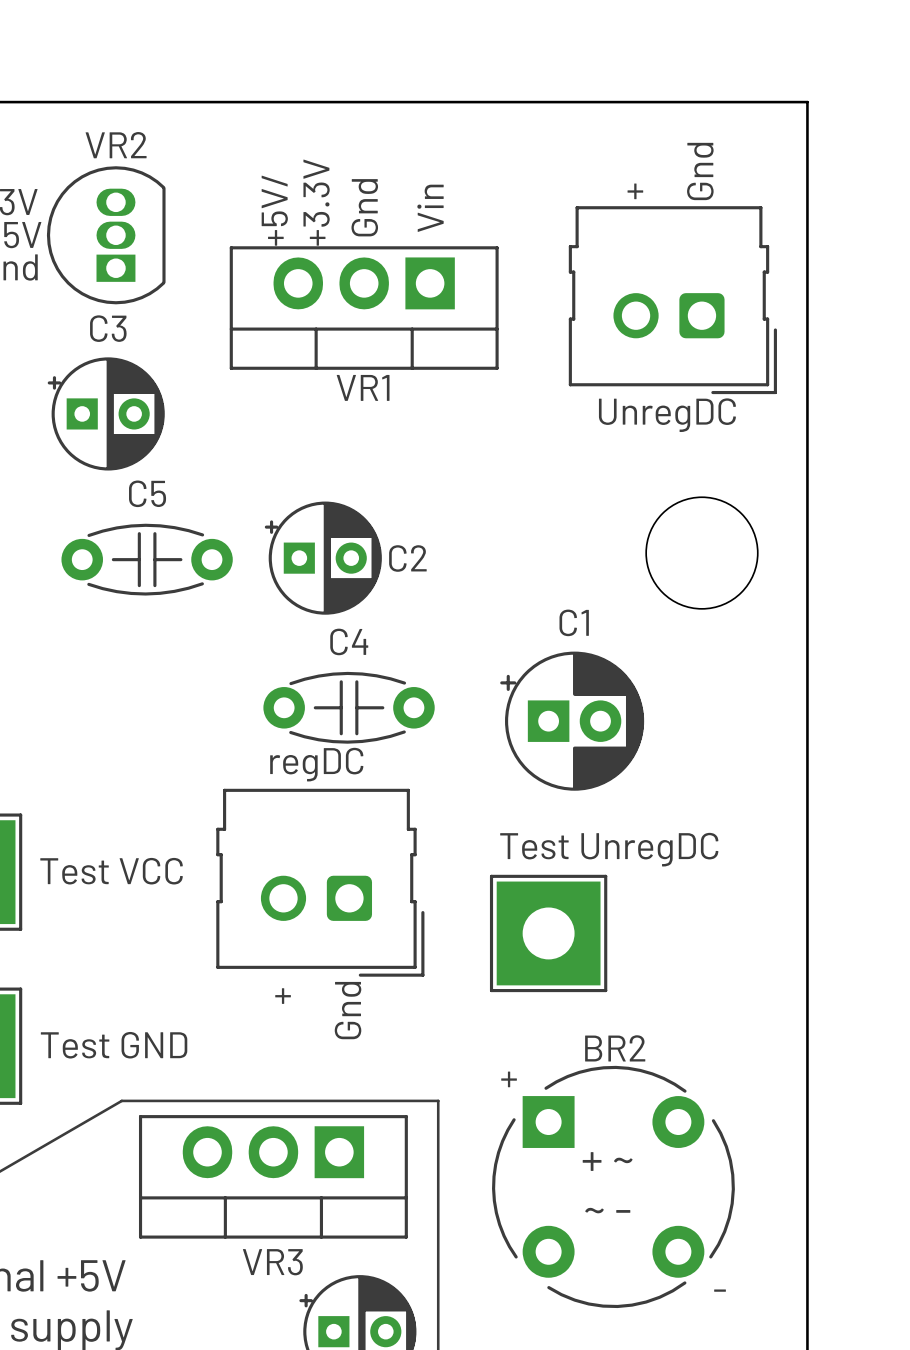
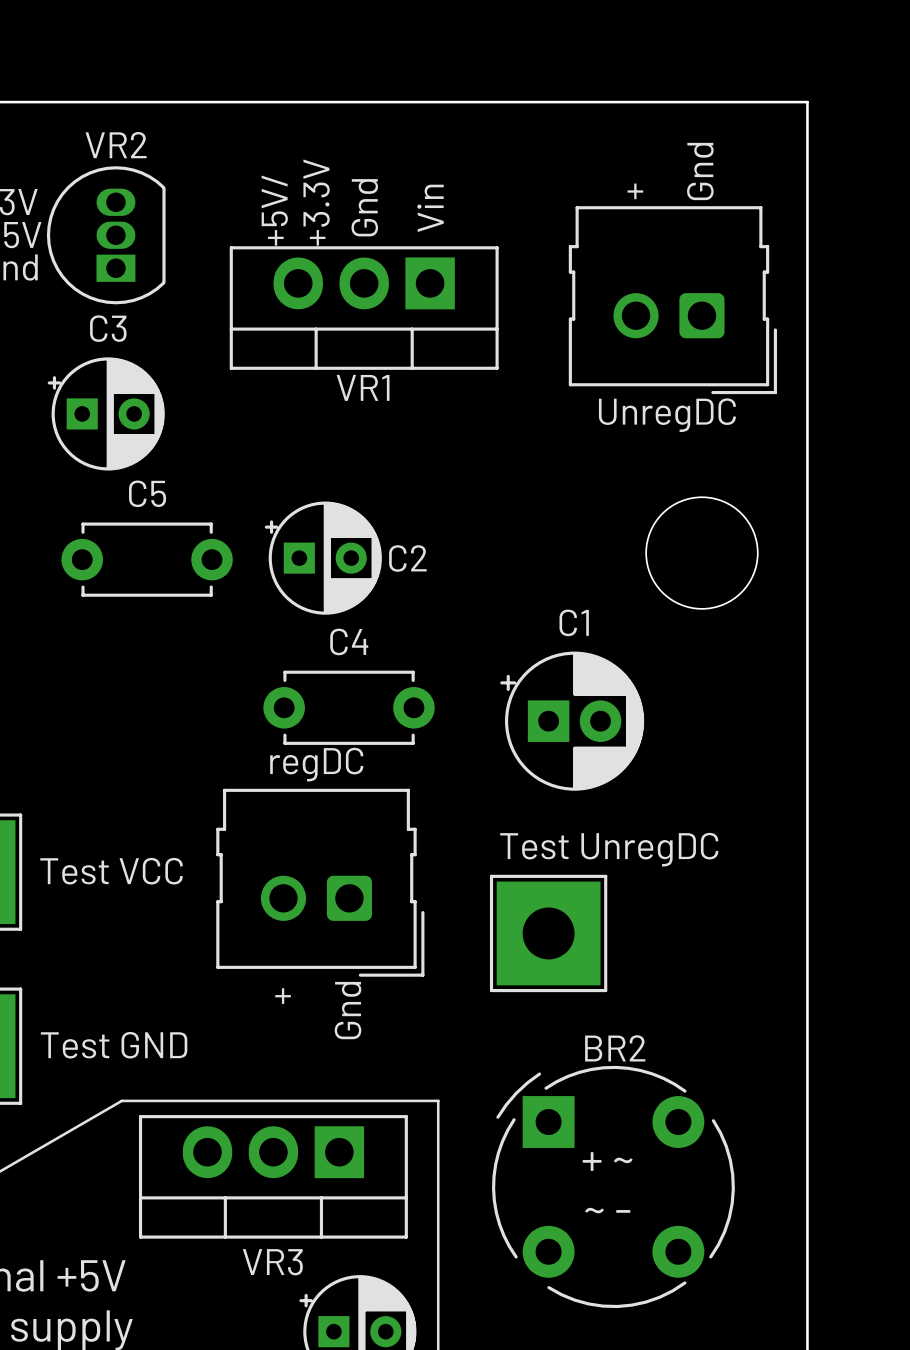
C5 footprint: [61, 523, 233, 596] -> [61, 522, 233, 597]
C4 footprint: [263, 671, 435, 744] -> [263, 670, 435, 745]
BR2 footprint: [492, 1065, 735, 1309] -> [492, 1065, 735, 1309]

